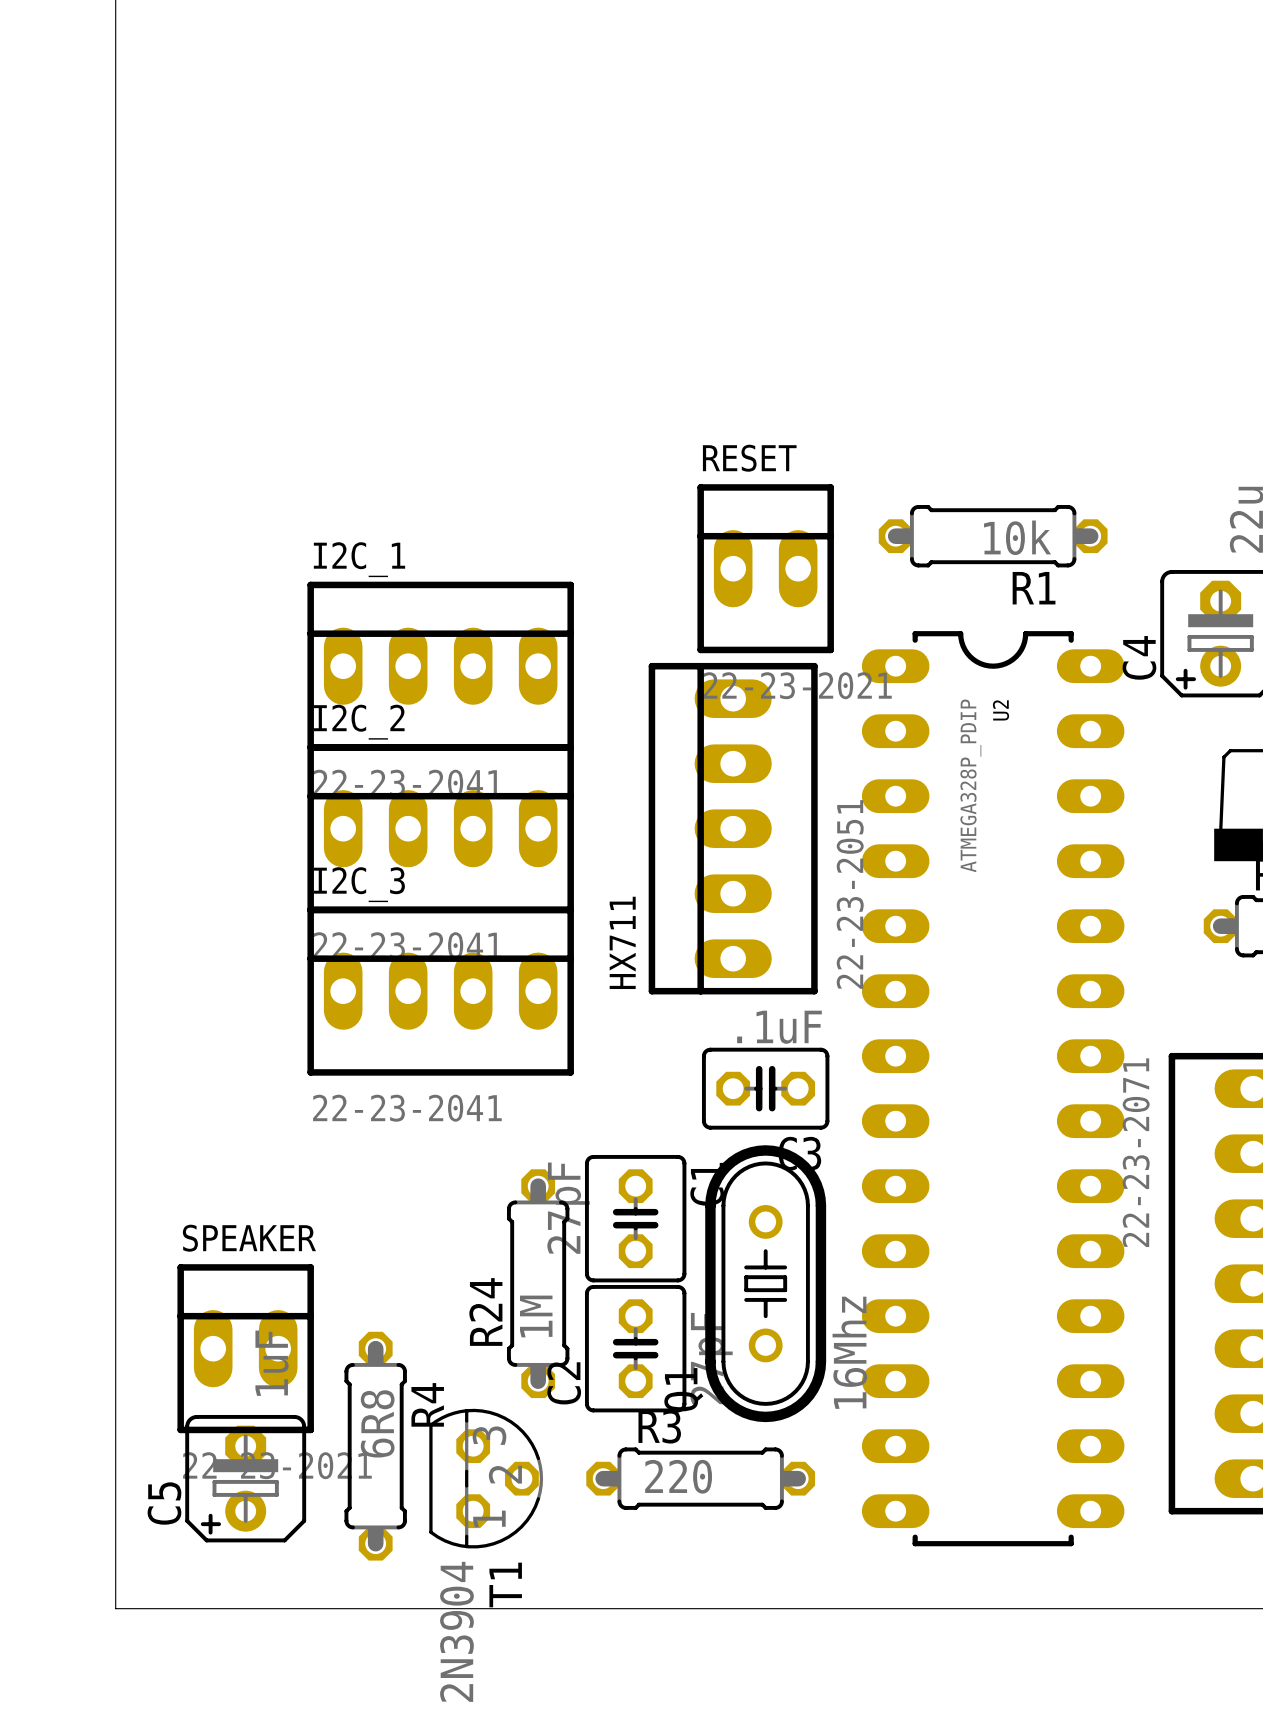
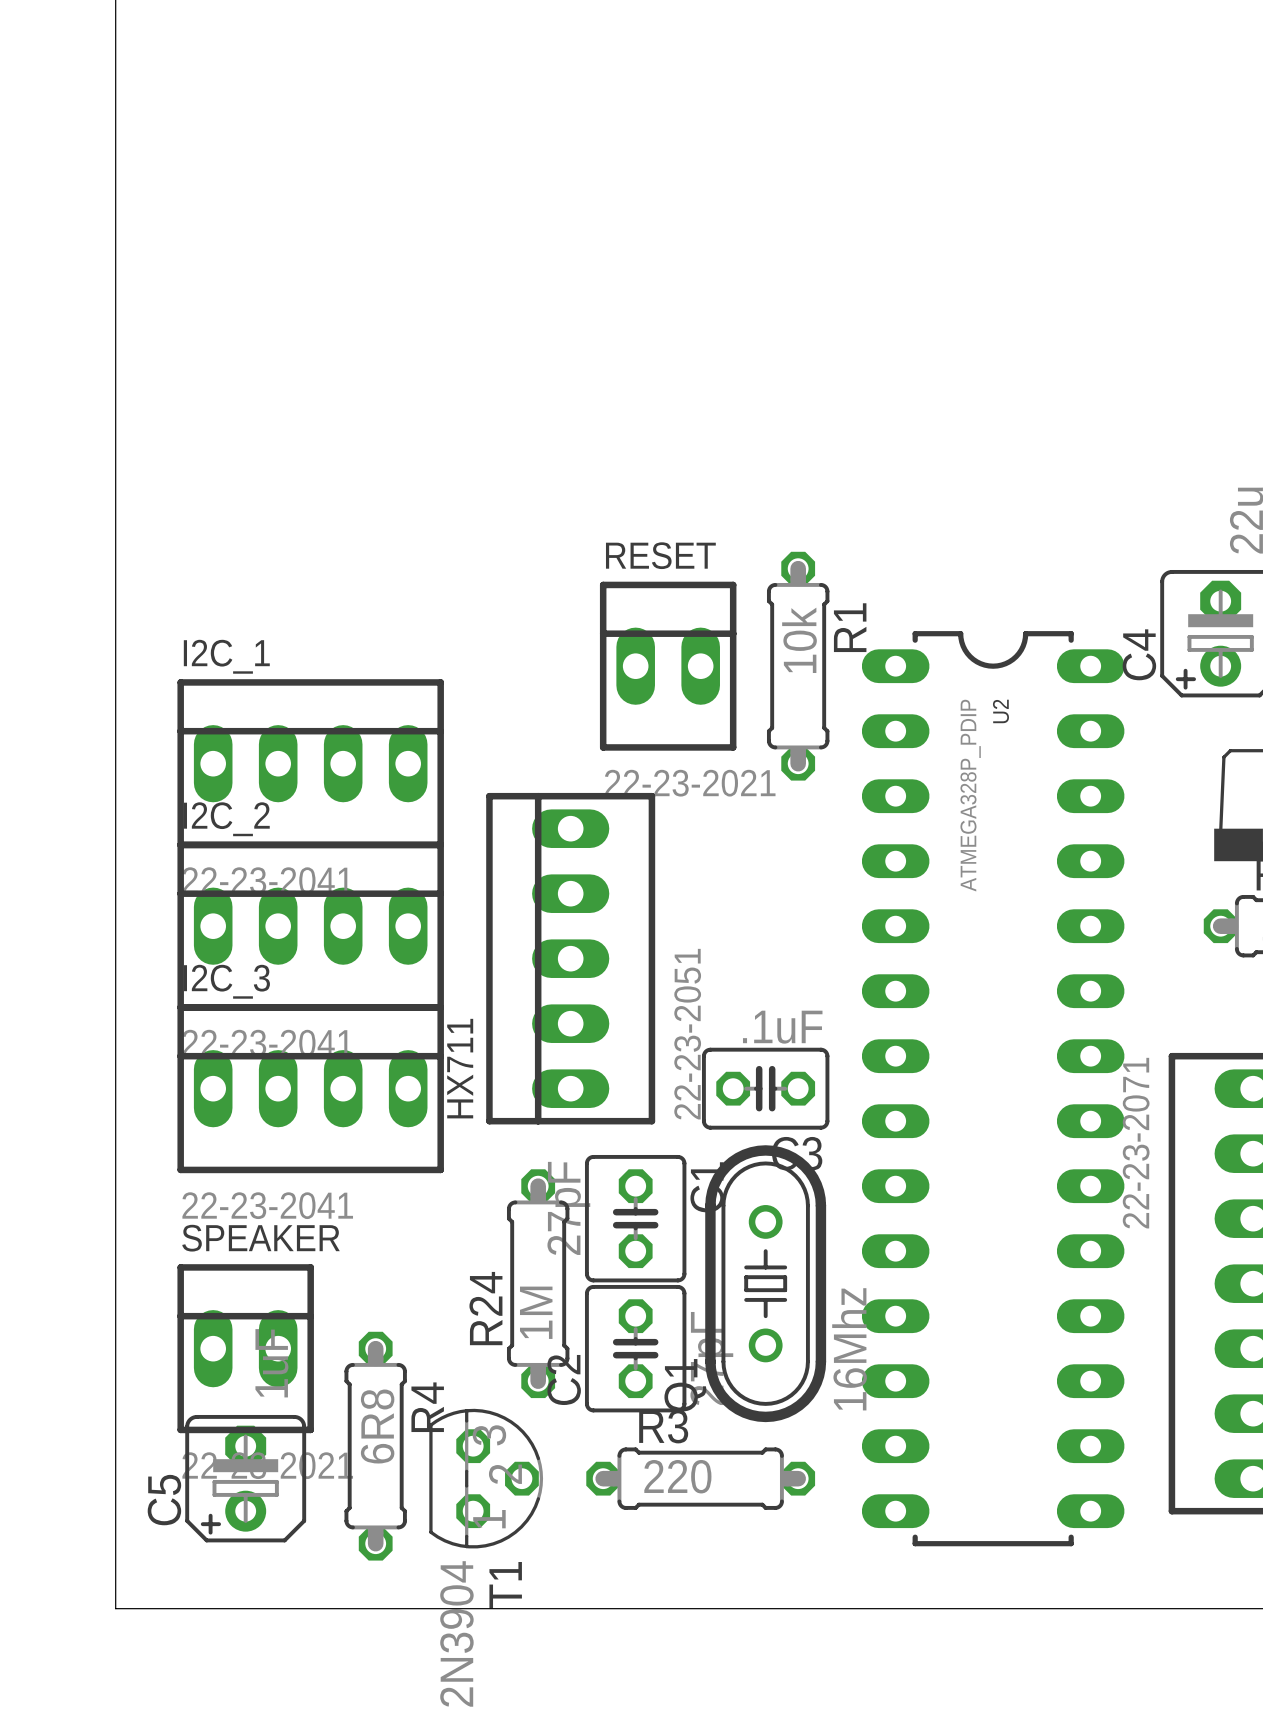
R1 rotation: 0° (993, 536) -> 90° clockwise (798, 666)
R1 position: (993, 536) -> (798, 666)
RESET position: (765, 568) -> (668, 666)
R1 name position: R1 (1034, 588) -> R1 (850, 627)
I2C_1 position: (440, 666) -> (310, 763)
I2C_2 position: (440, 828) -> (310, 926)
HX711 position: (733, 828) -> (570, 958)
I2C_3 position: (440, 991) -> (310, 1088)

